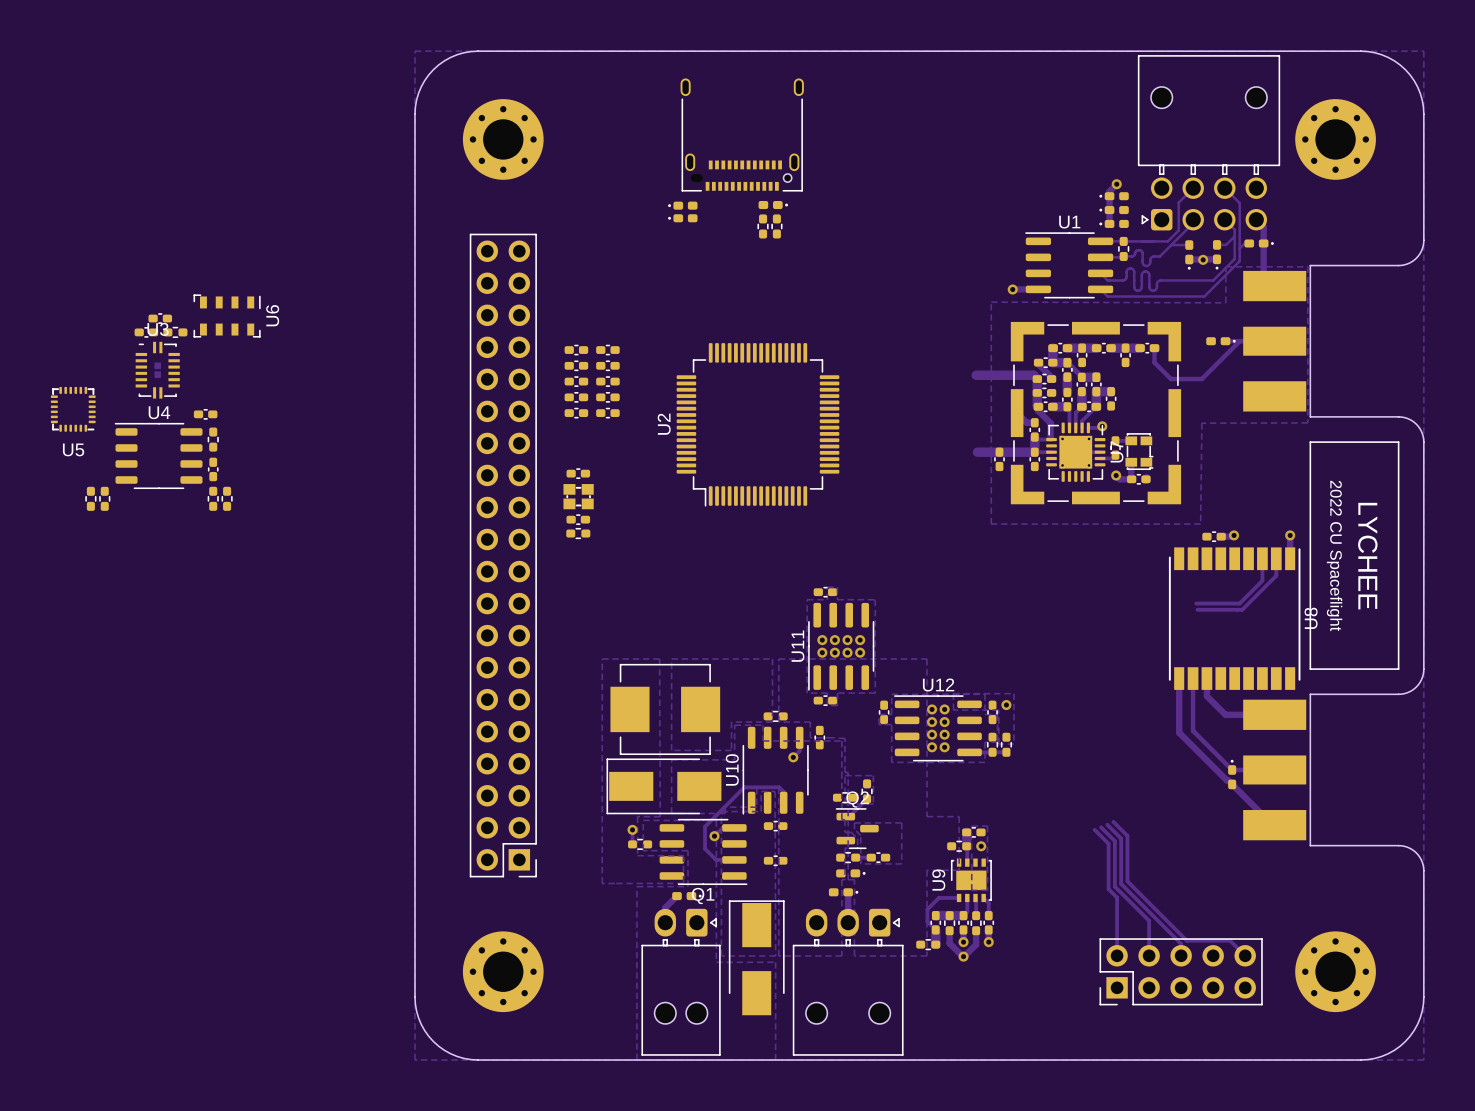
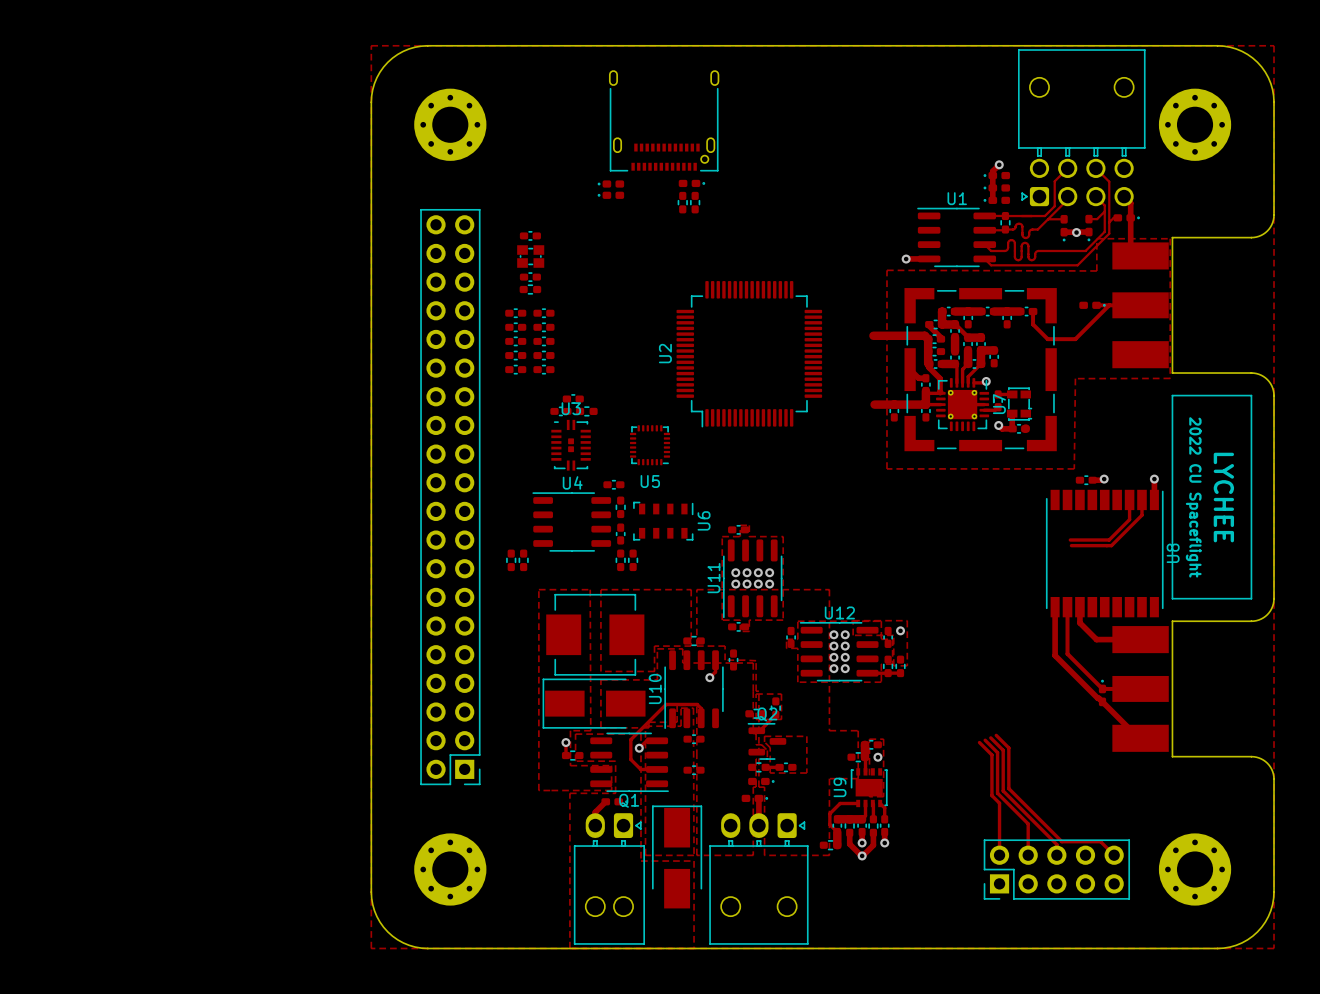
part: none -> (530, 235)
part: none -> (530, 277)
U6 position: (227, 315) -> (663, 521)
part: (160, 318) -> none
part: none -> (530, 289)
part: (146, 332) -> none
part: (175, 332) -> none
U3 position: (157, 370) -> (571, 445)
U5 position: (73, 409) -> (650, 445)
part: (205, 414) -> none
U2 position: (758, 424) -> (749, 354)
part: (213, 439) -> none
part: none -> (573, 398)
U4 position: (158, 455) -> (571, 521)
part: none -> (560, 411)
part: none -> (586, 411)
part: (213, 469) -> none
part: (578, 473) -> none
part position: (578, 496) -> (530, 256)
part: (90, 498) -> none
part: (104, 498) -> none
part: (213, 498) -> none
part: (227, 498) -> none
part: (578, 519) -> none
part: (578, 533) -> none
part: none -> (613, 484)
part: none -> (620, 507)
part: none -> (620, 534)
part: none -> (511, 560)
part: none -> (523, 560)
part: none -> (620, 560)
part: none -> (633, 560)

